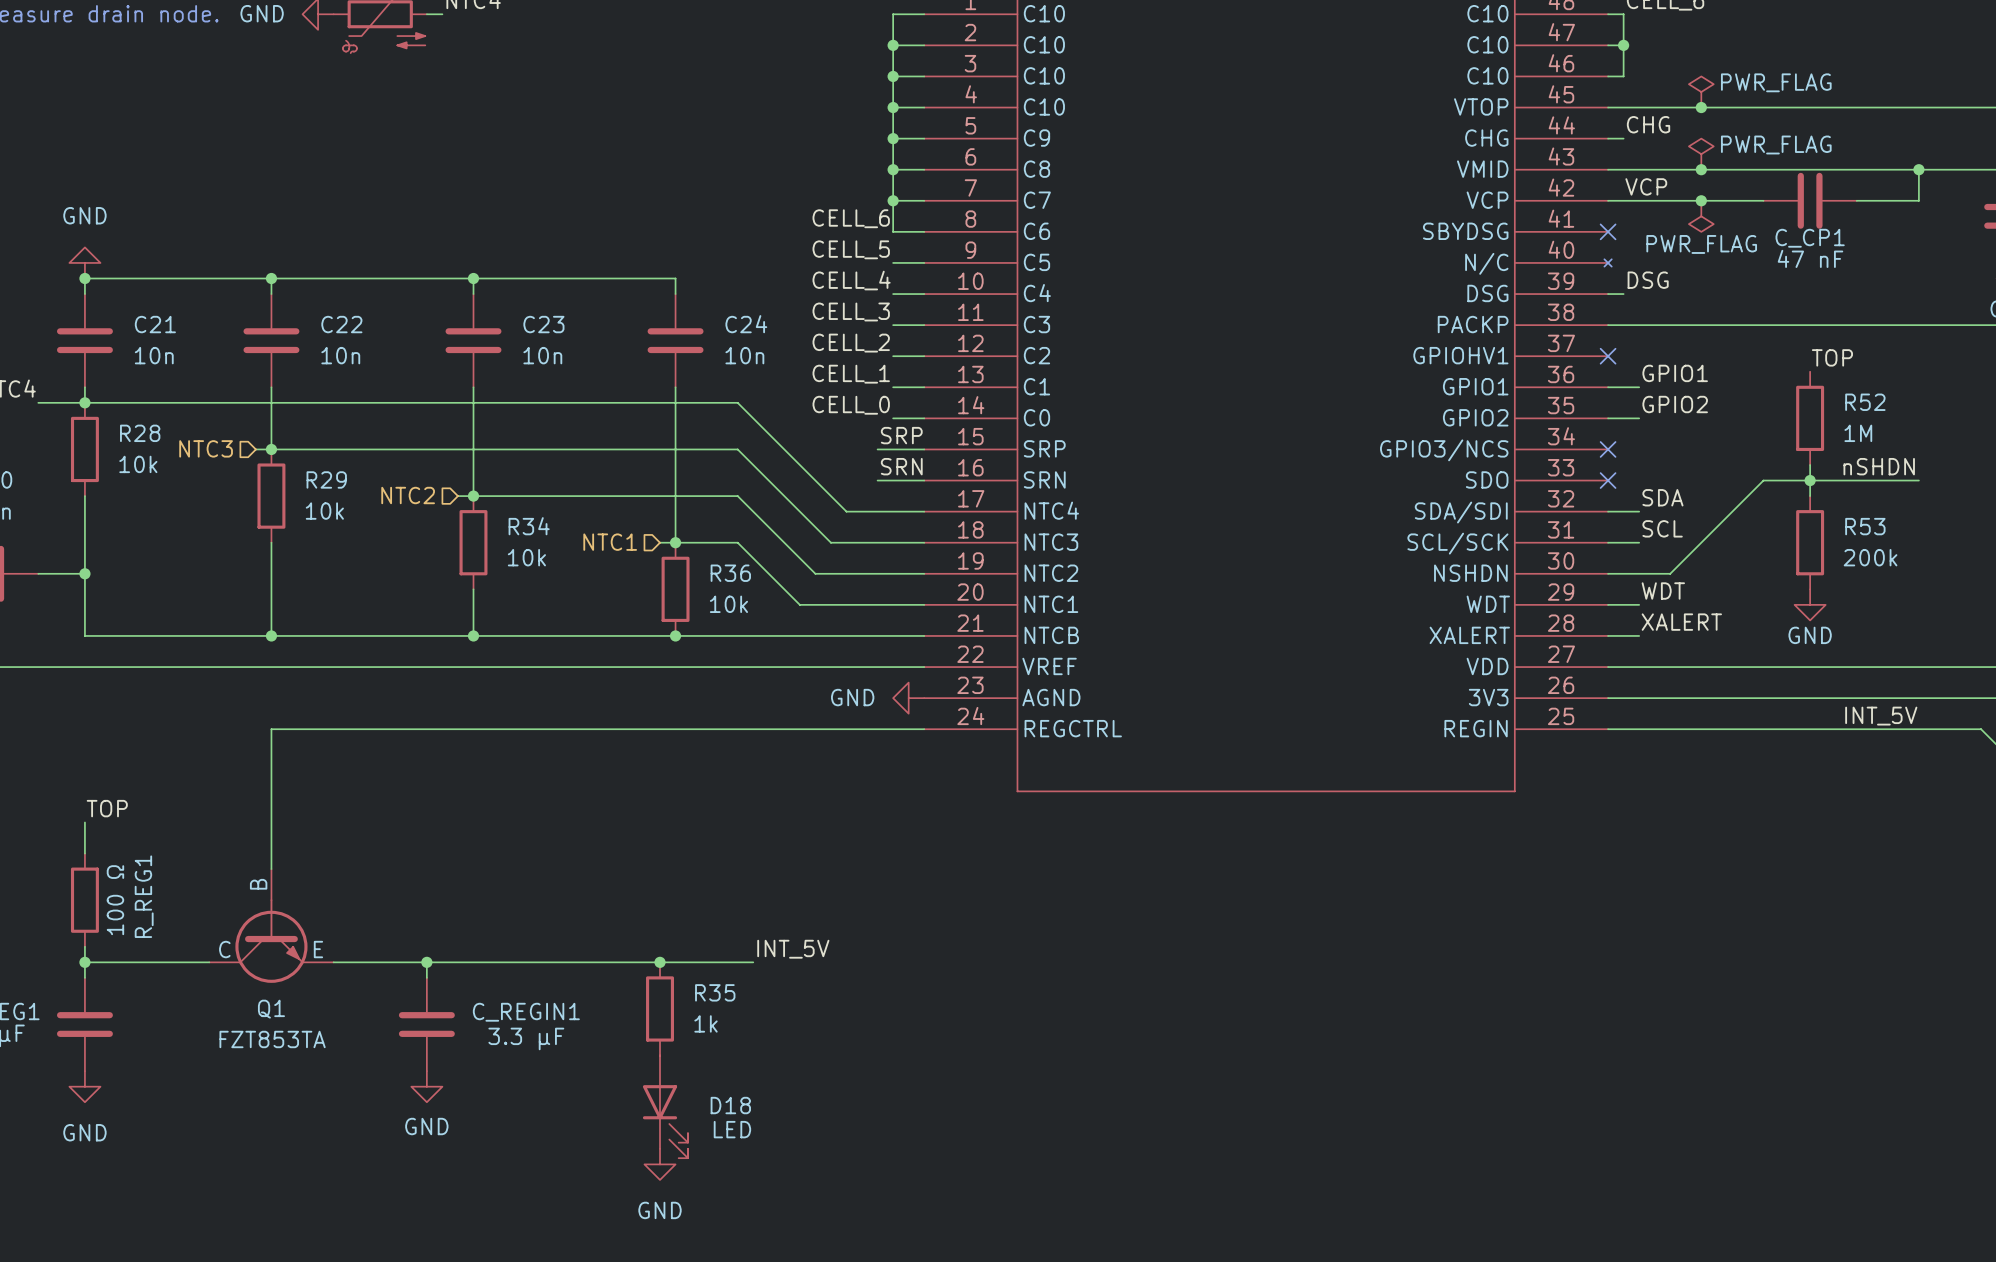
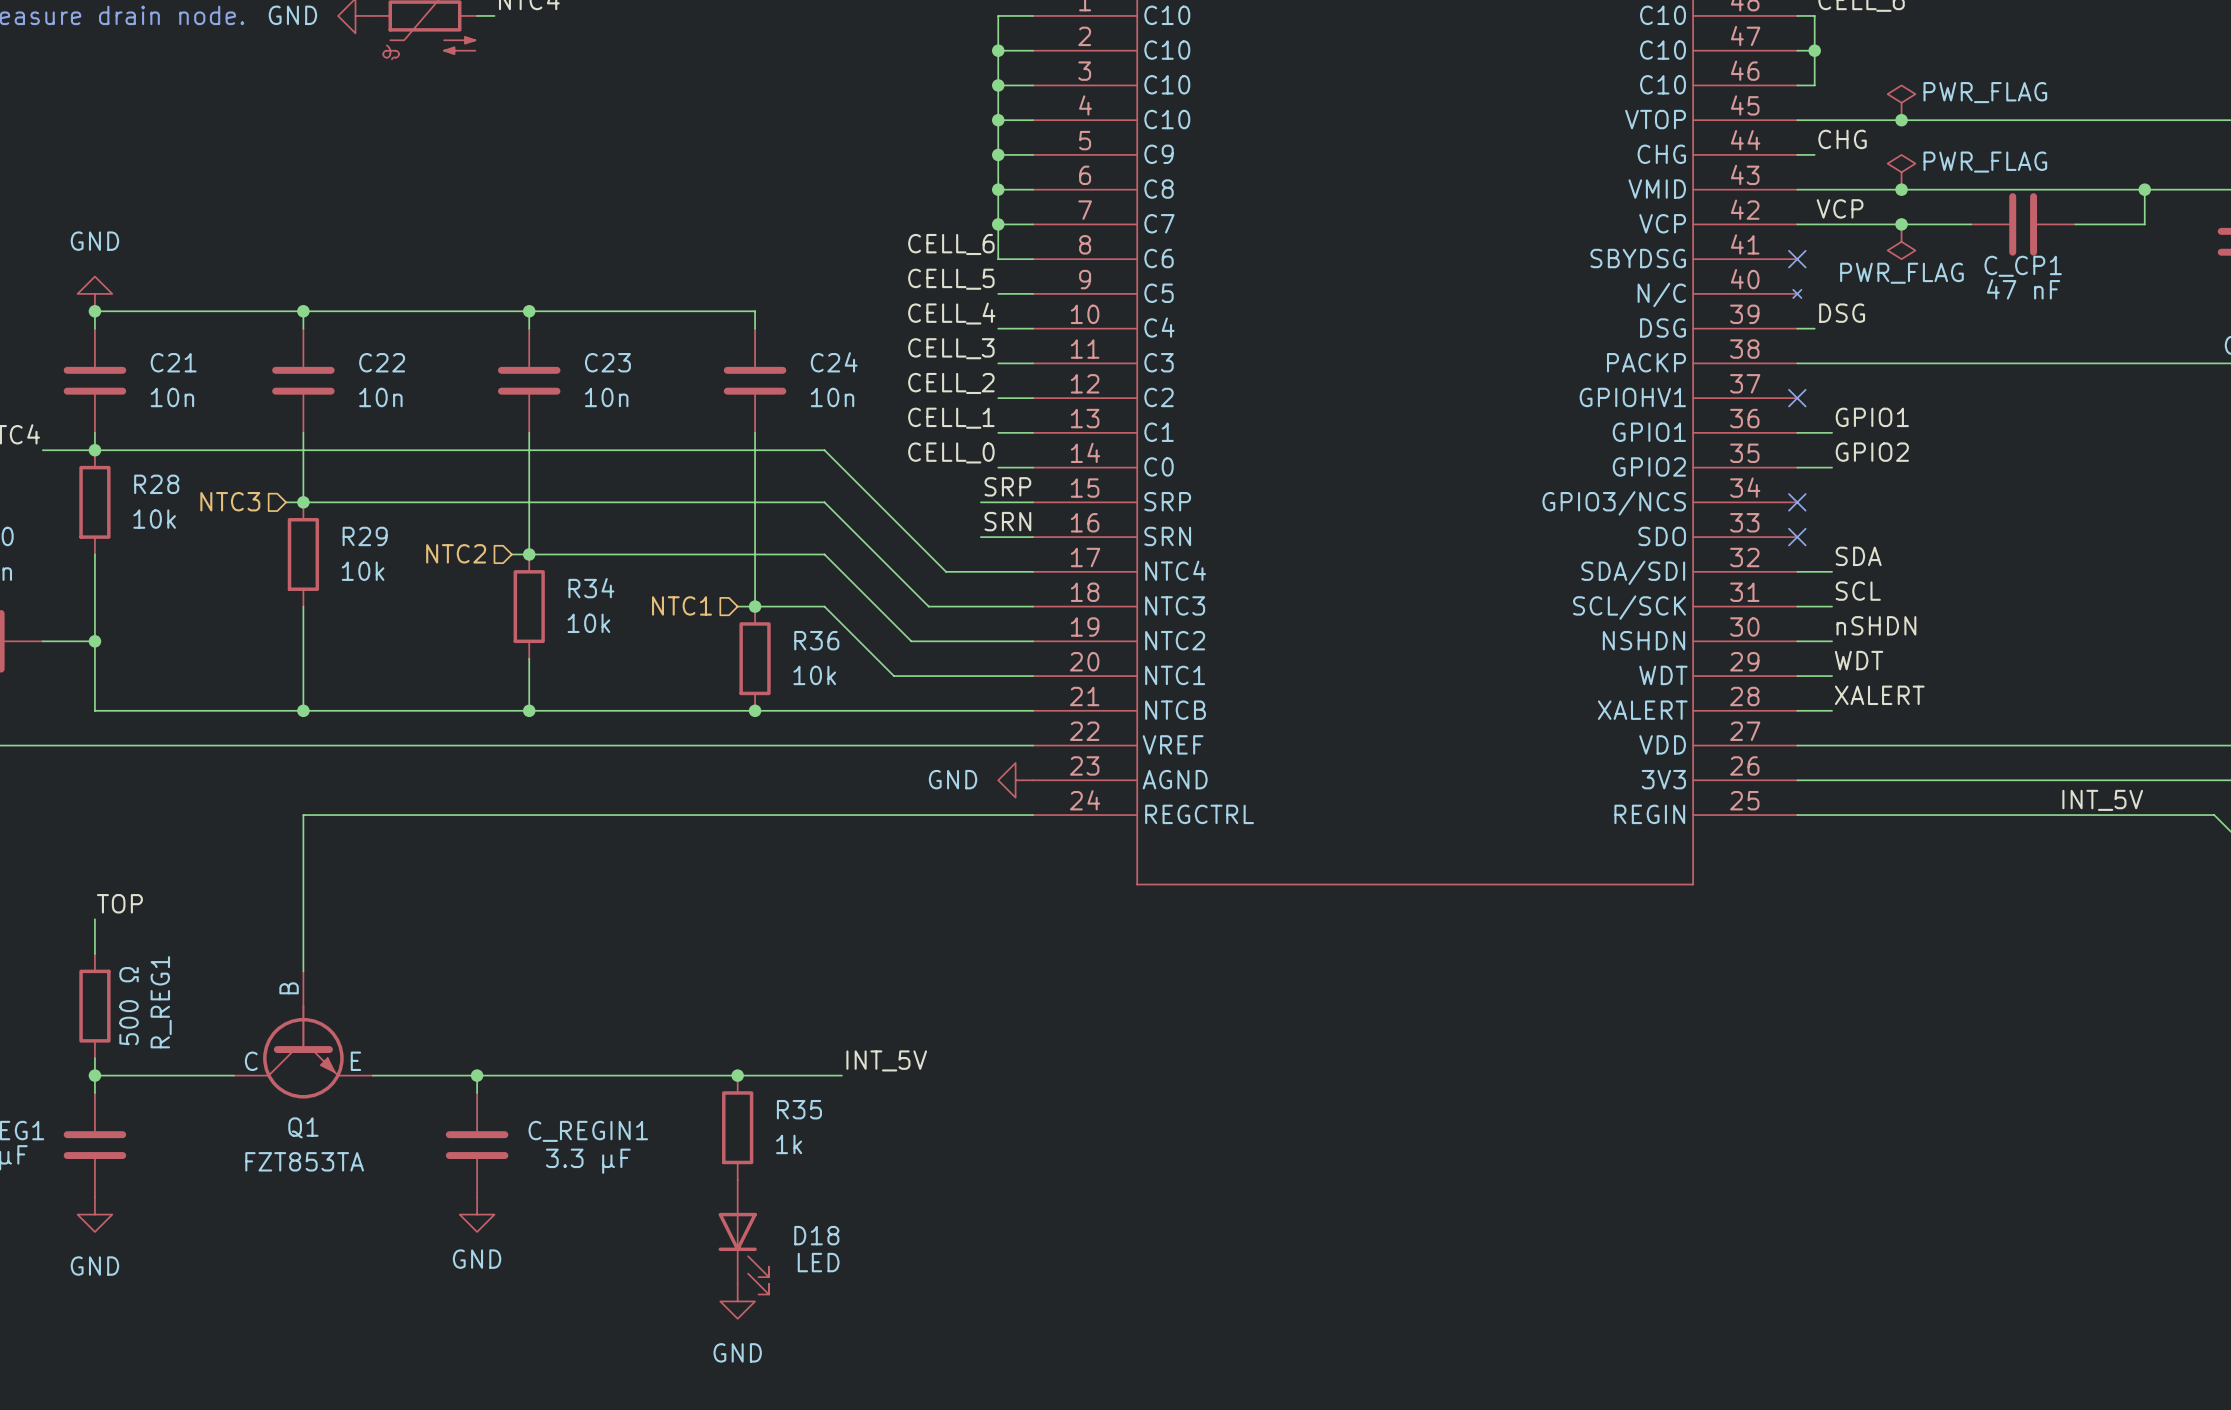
label: TOP (1832, 357) -> none
R52: 1M (1810, 418) -> none
wire: (1810, 465) (1810, 496) -> none
label position: nSHDN (1879, 466) -> nSHDN (1876, 625)
junction: (1810, 480) -> none
wire: (1918, 480) (1763, 480) (1670, 573) (1639, 573) -> none
R53: 200k (1810, 542) -> none
power symbol: GND (1810, 604) -> none
R_REG1 value: 100 Ω (115, 900) -> 500 Ω (129, 1006)

